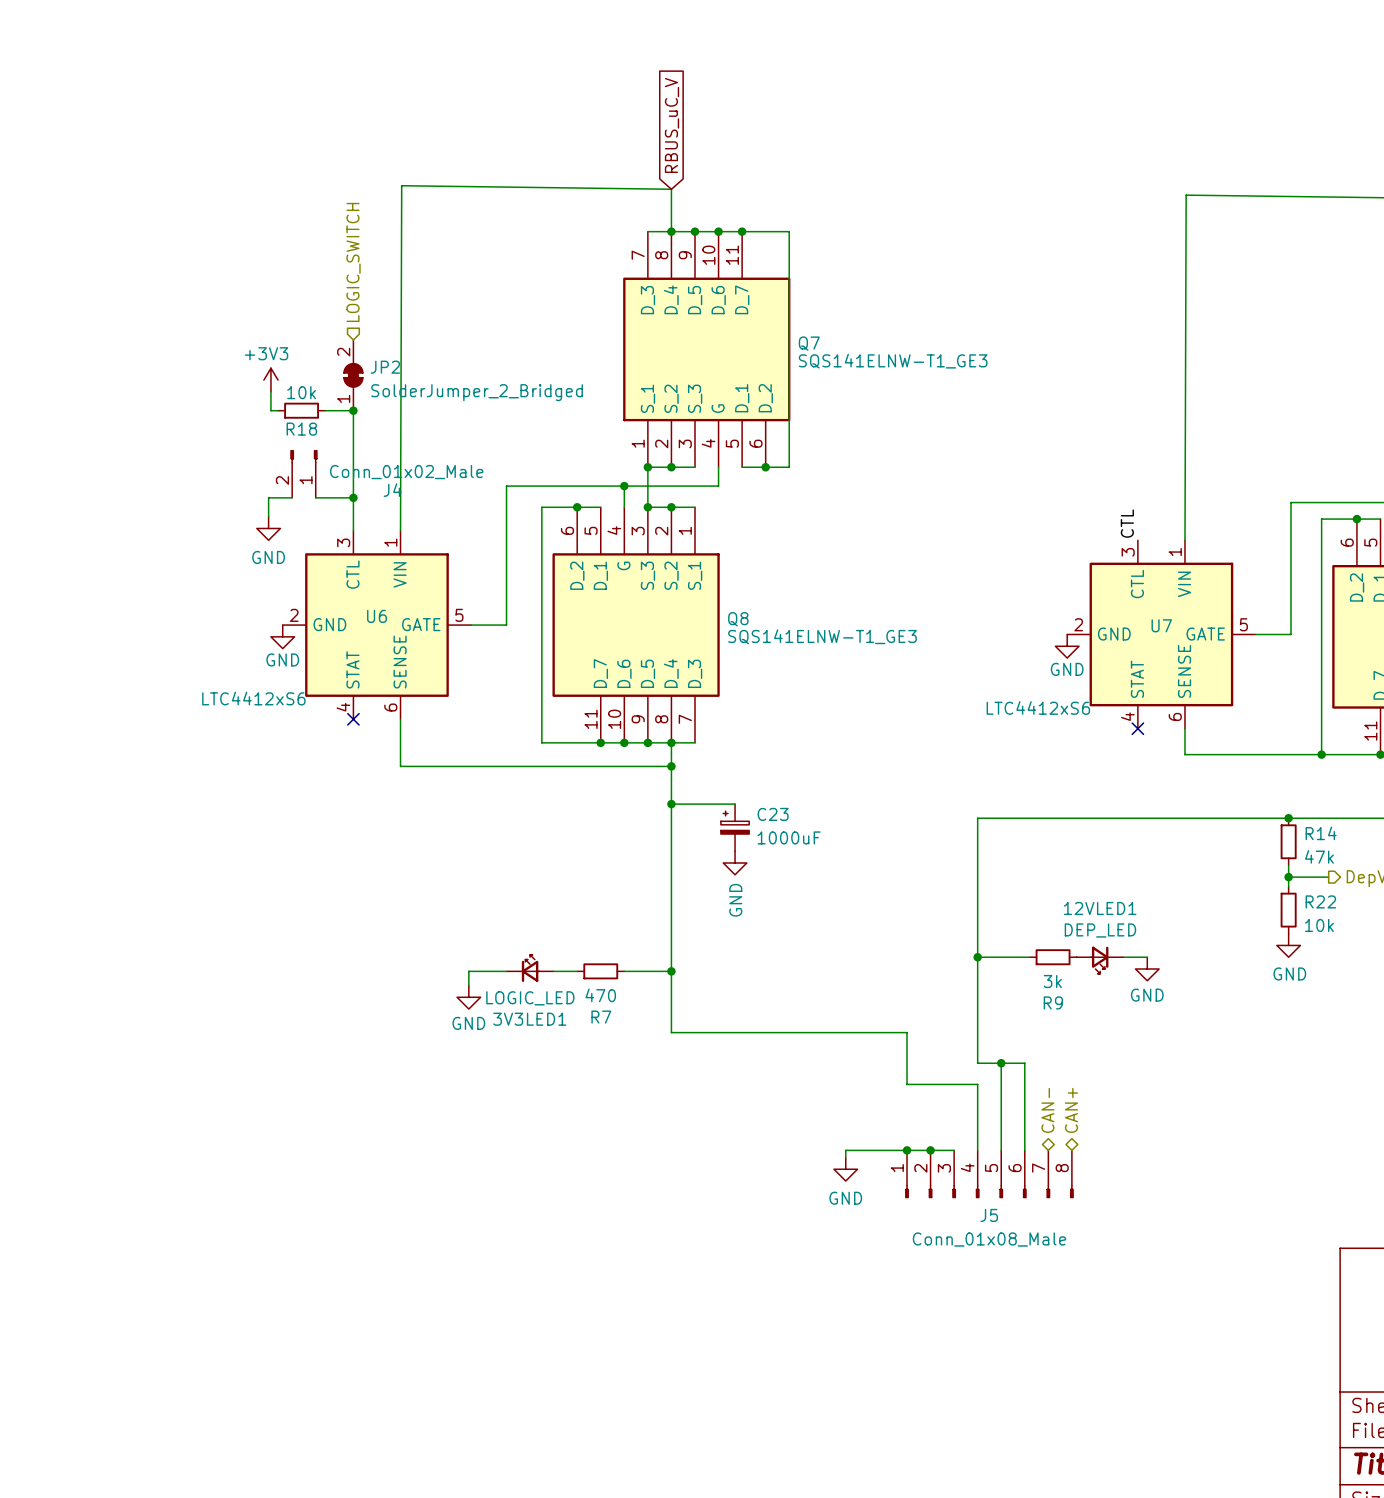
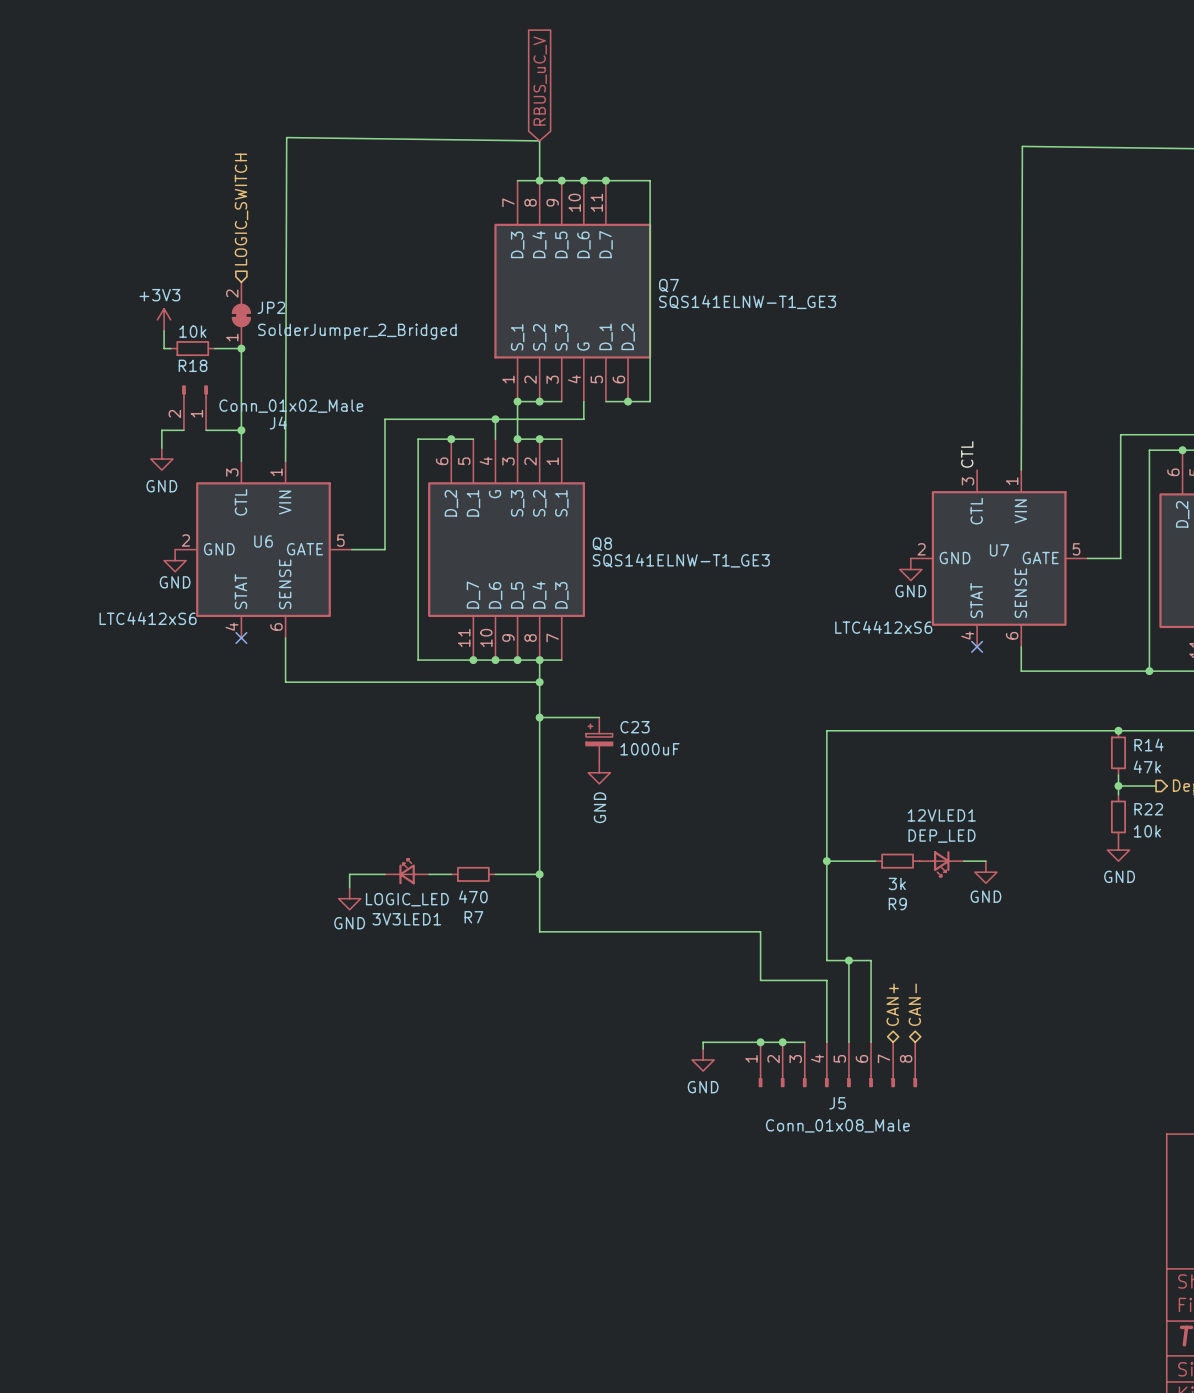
hierarchical label: CAN- (1047, 1110) -> CAN+ (892, 1004)
hierarchical label: CAN+ (1071, 1110) -> CAN- (914, 1004)

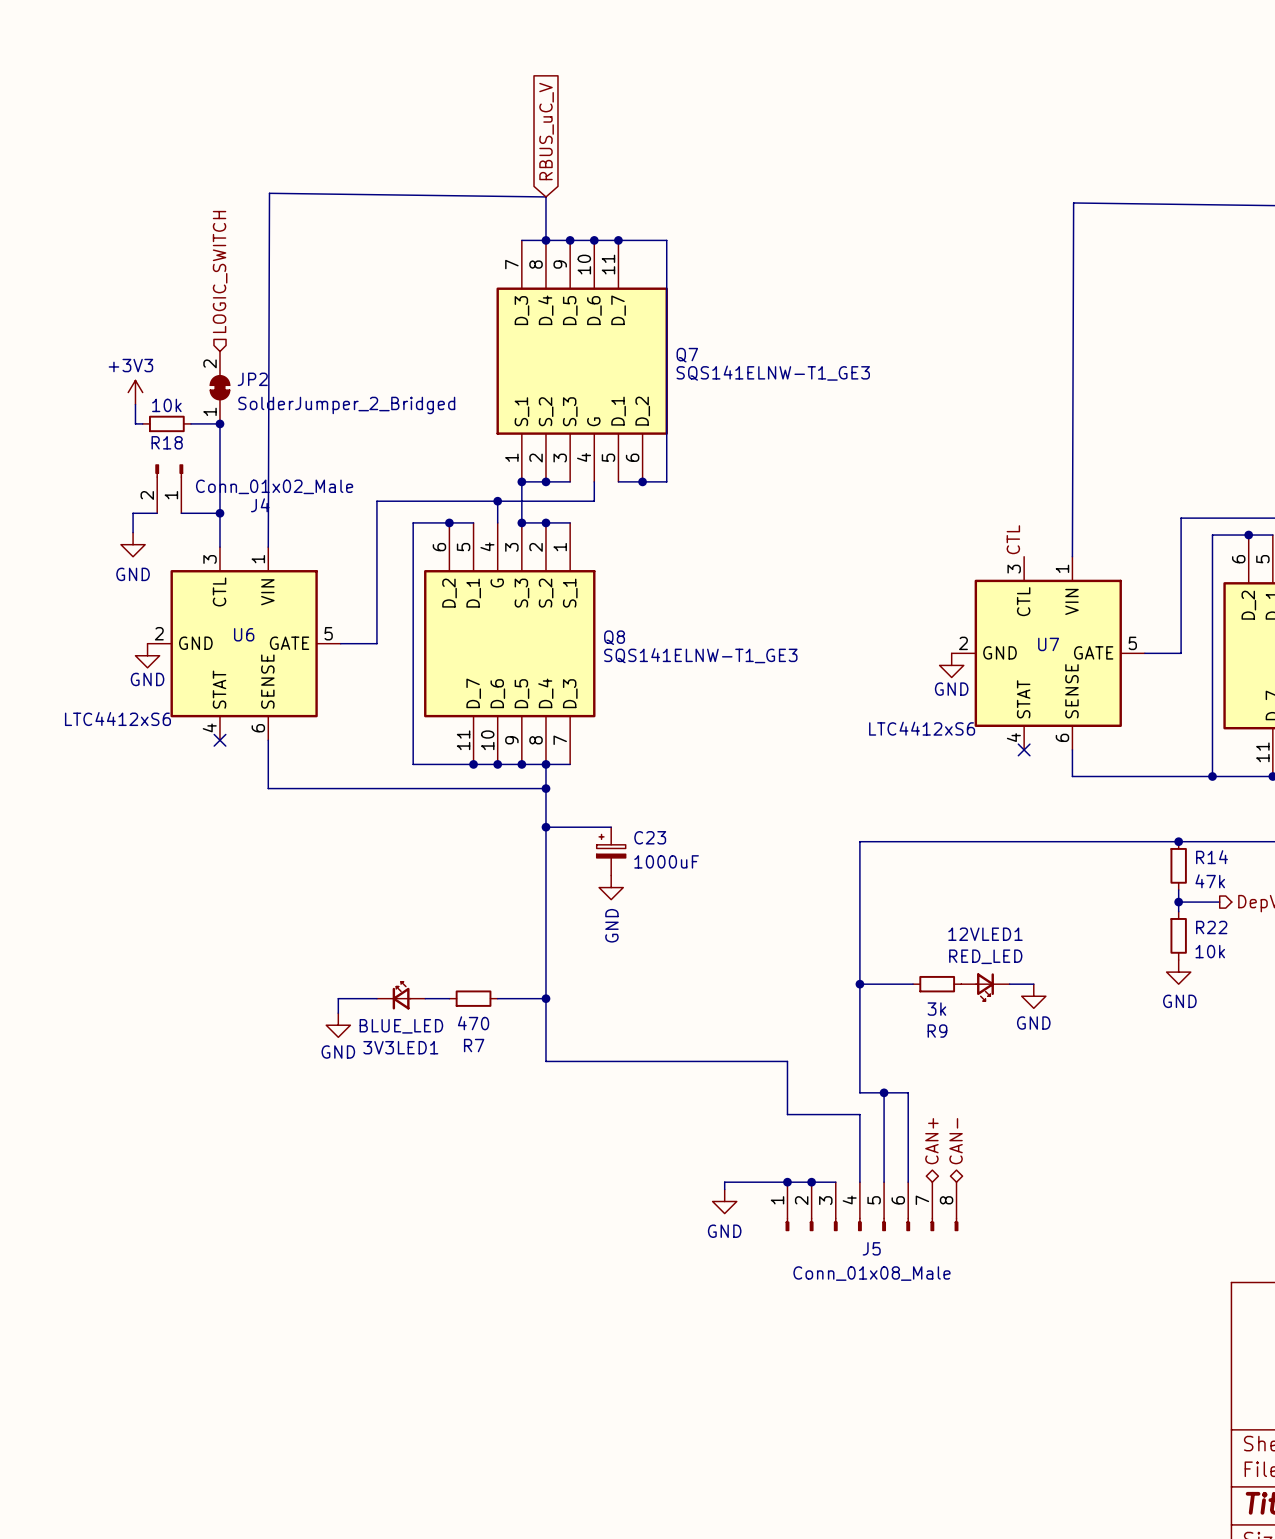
12VLED1 value: DEP_LED (942, 836) -> RED_LED (985, 956)
3V3LED1 value: LOGIC_LED (407, 899) -> BLUE_LED (401, 1026)

